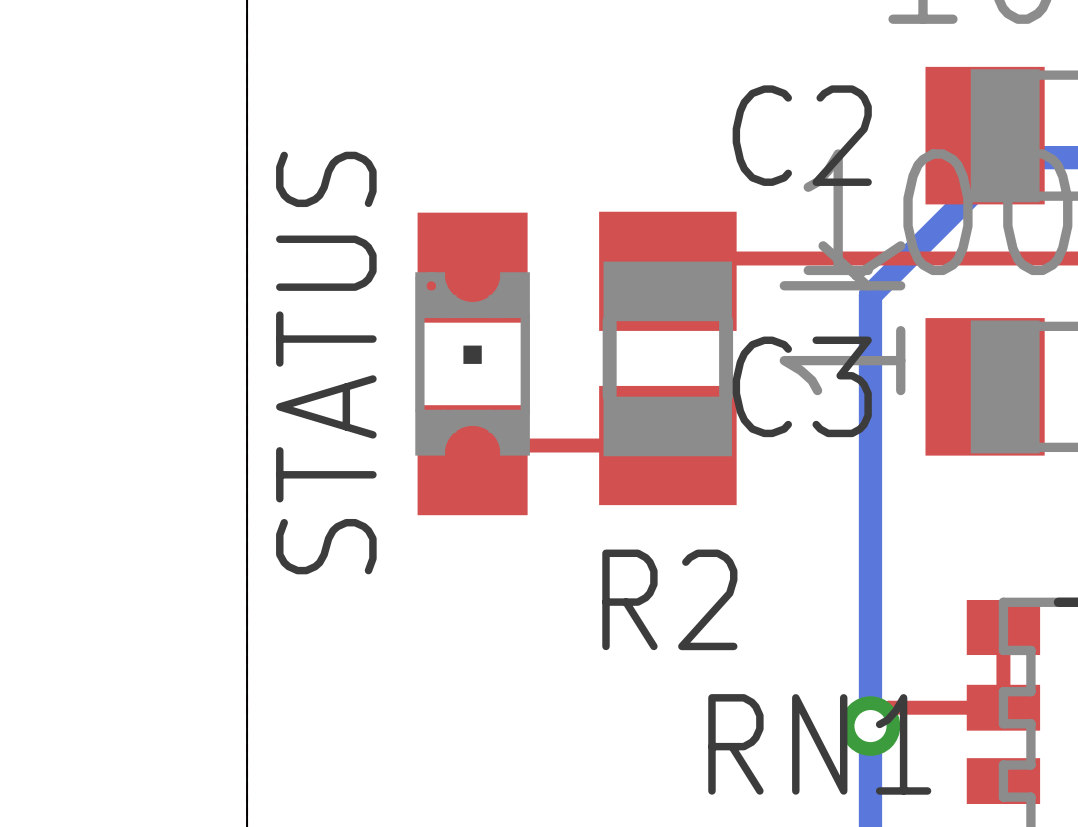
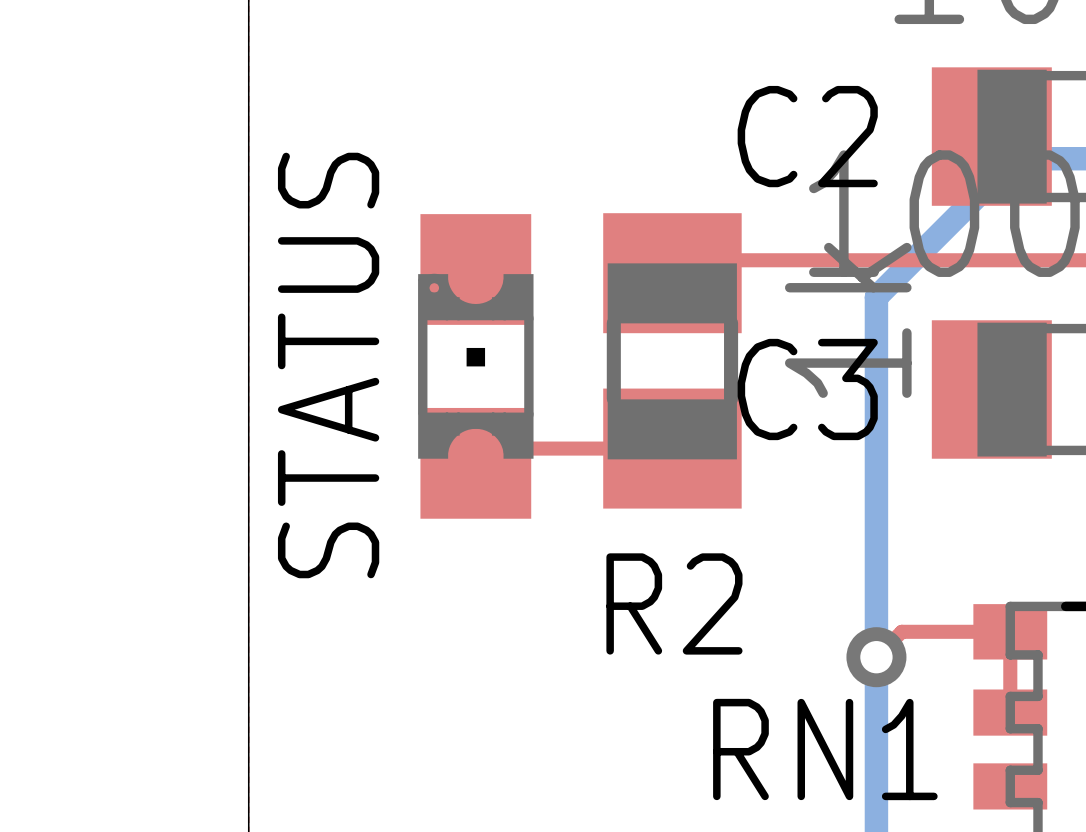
top track: none -> (1010, 631) (901, 631) (876, 657)
top track: (1003, 707) (888, 707) (870, 726) -> none
via position: (870, 726) -> (876, 657)

